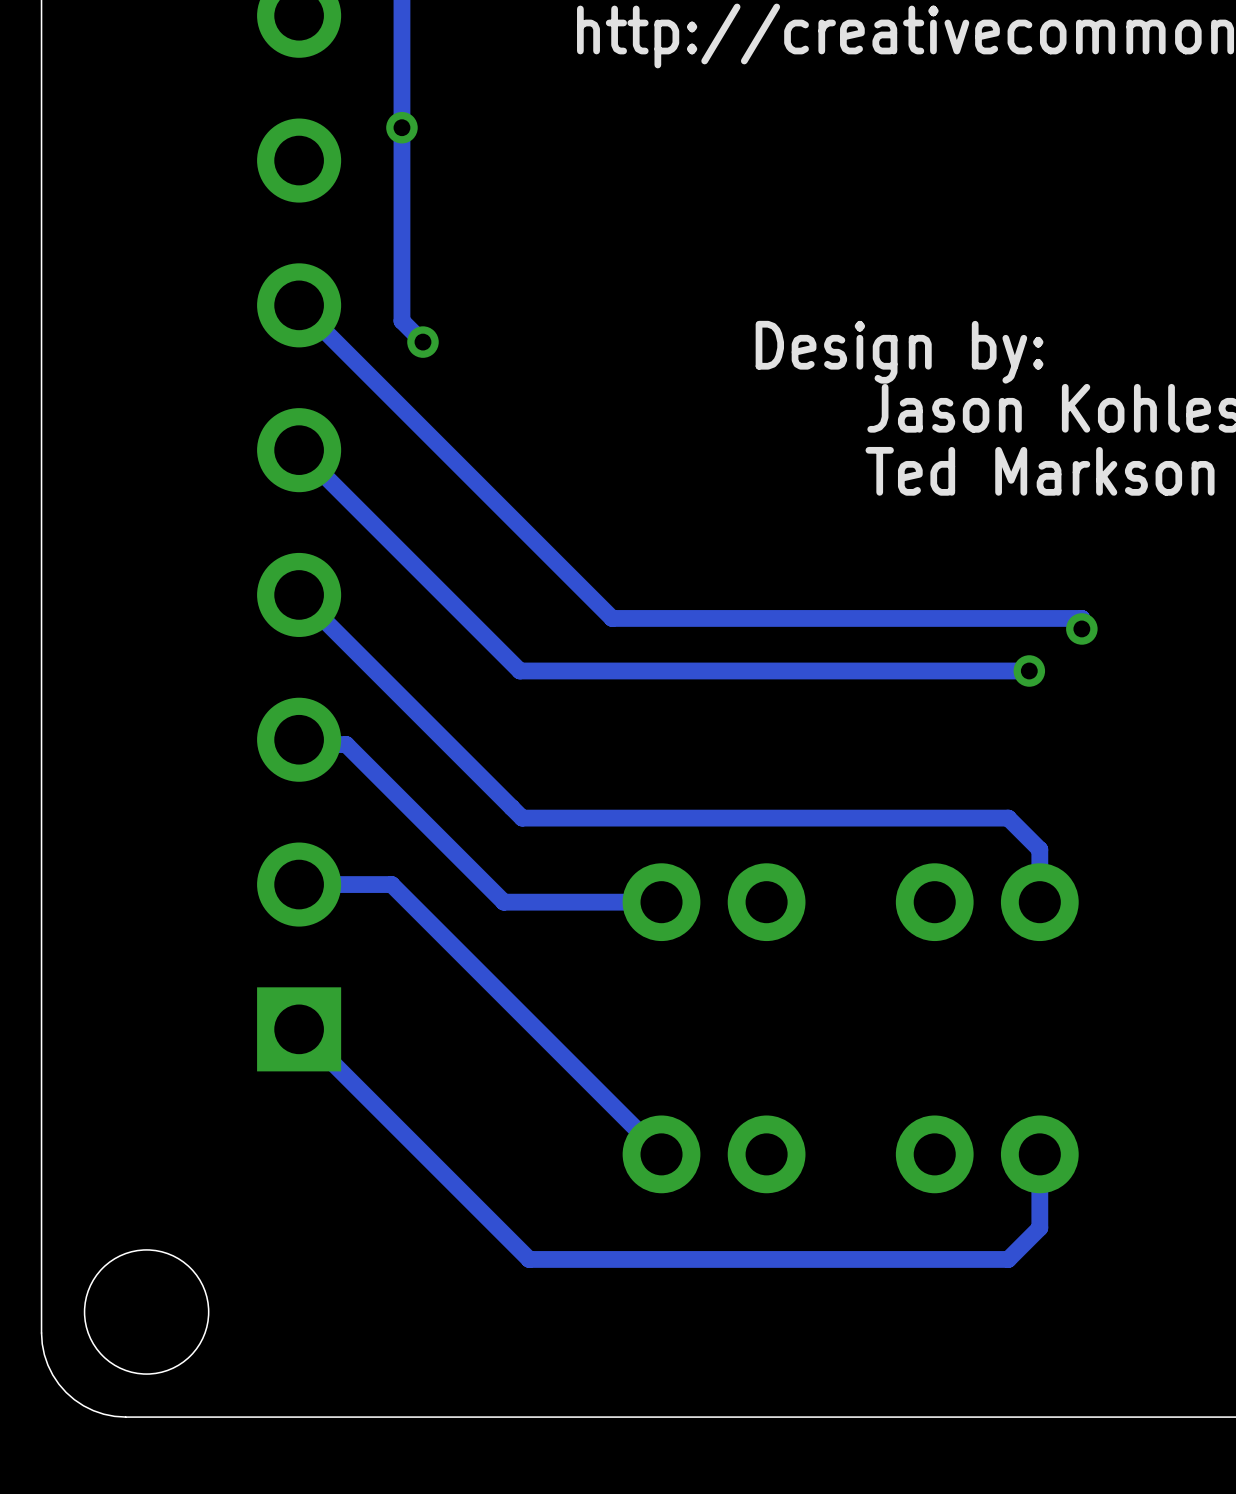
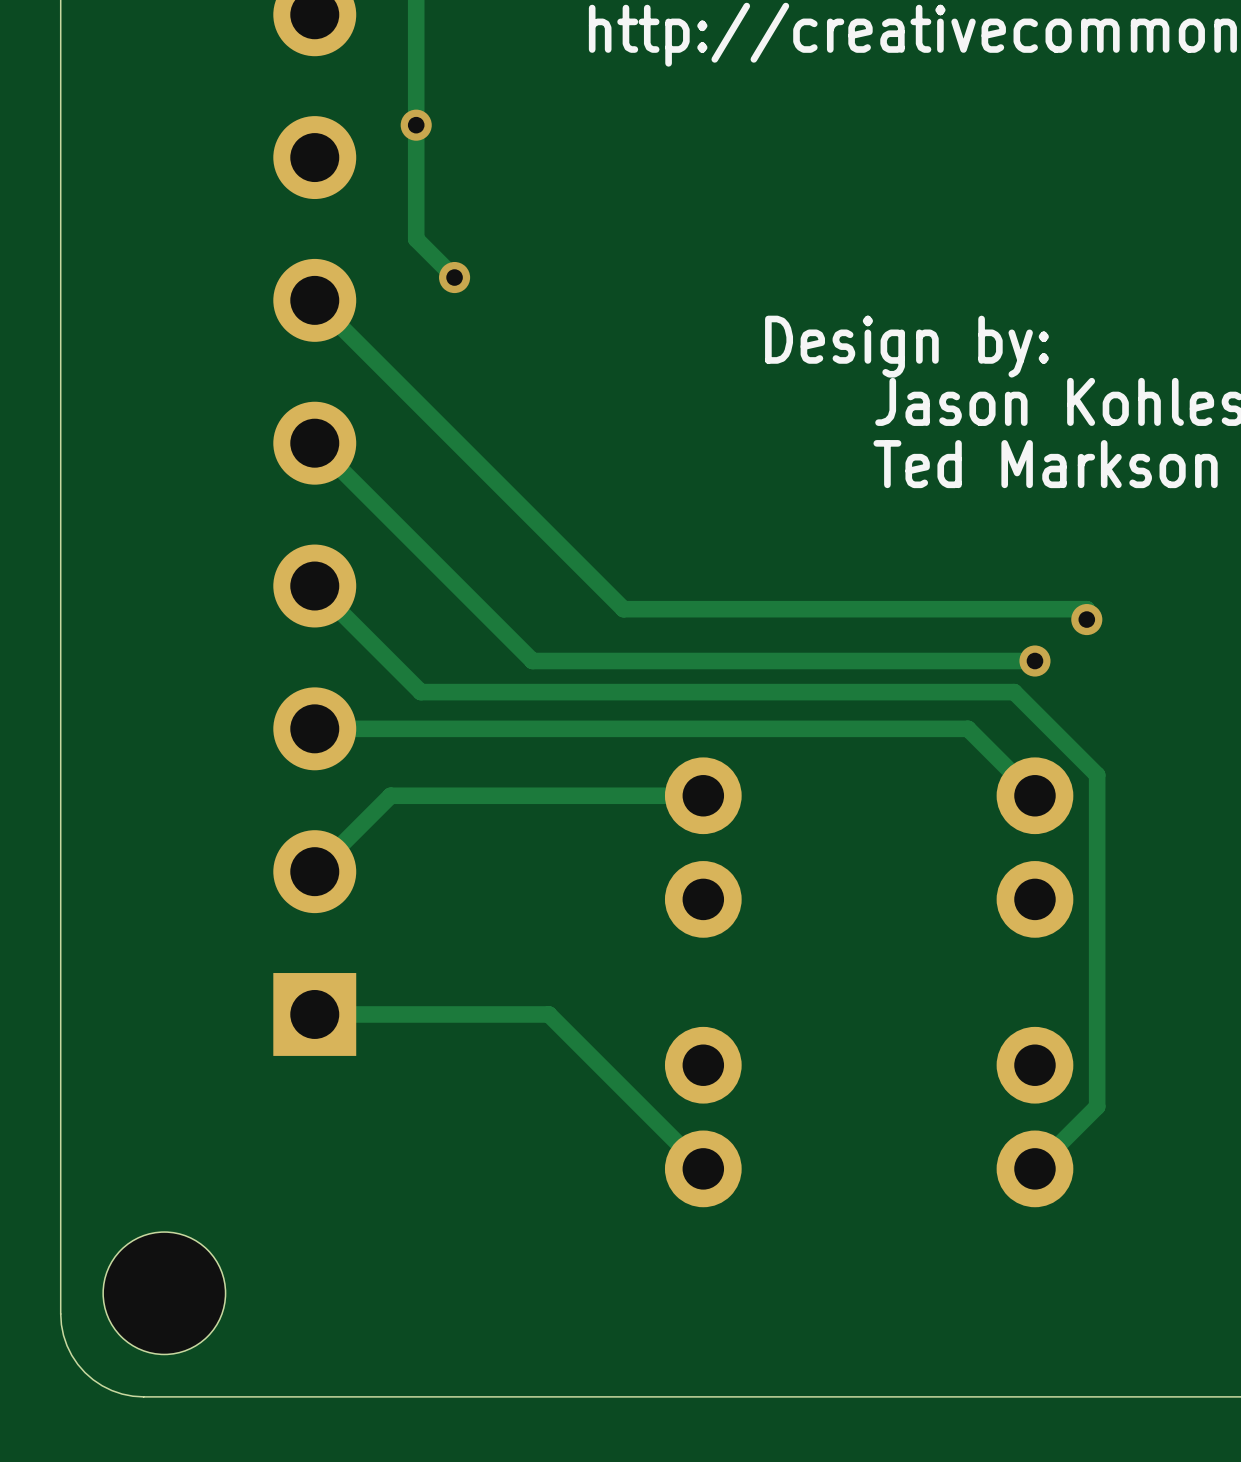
track: (401, 243) (401, 321) (422, 342) -> (416, 239) (454, 277)
via position: (422, 342) -> (454, 277)
track: (406, 702) (522, 818) (1008, 818) (1039, 849) (1039, 902) -> (420, 692) (1014, 692) (1097, 775) (1097, 1106) (1034, 1168)
track: (299, 739) (303, 744) (346, 744) (503, 902) (661, 902) -> (314, 728) (968, 728) (1034, 795)
track: none -> (703, 795) (390, 795) (314, 871)
track: (299, 884) (391, 884) (536, 1029) -> (314, 1014) (548, 1014)
part rotation: 0° (714, 902) -> 90° clockwise (703, 847)
part rotation: 0° (987, 902) -> 90° clockwise (1034, 847)
track: (299, 1029) (529, 1259) (1008, 1259) (1039, 1227) (1039, 1154) -> none
part rotation: 0° (714, 1154) -> 90° clockwise (703, 1117)
part rotation: 0° (987, 1154) -> 90° clockwise (1034, 1117)

